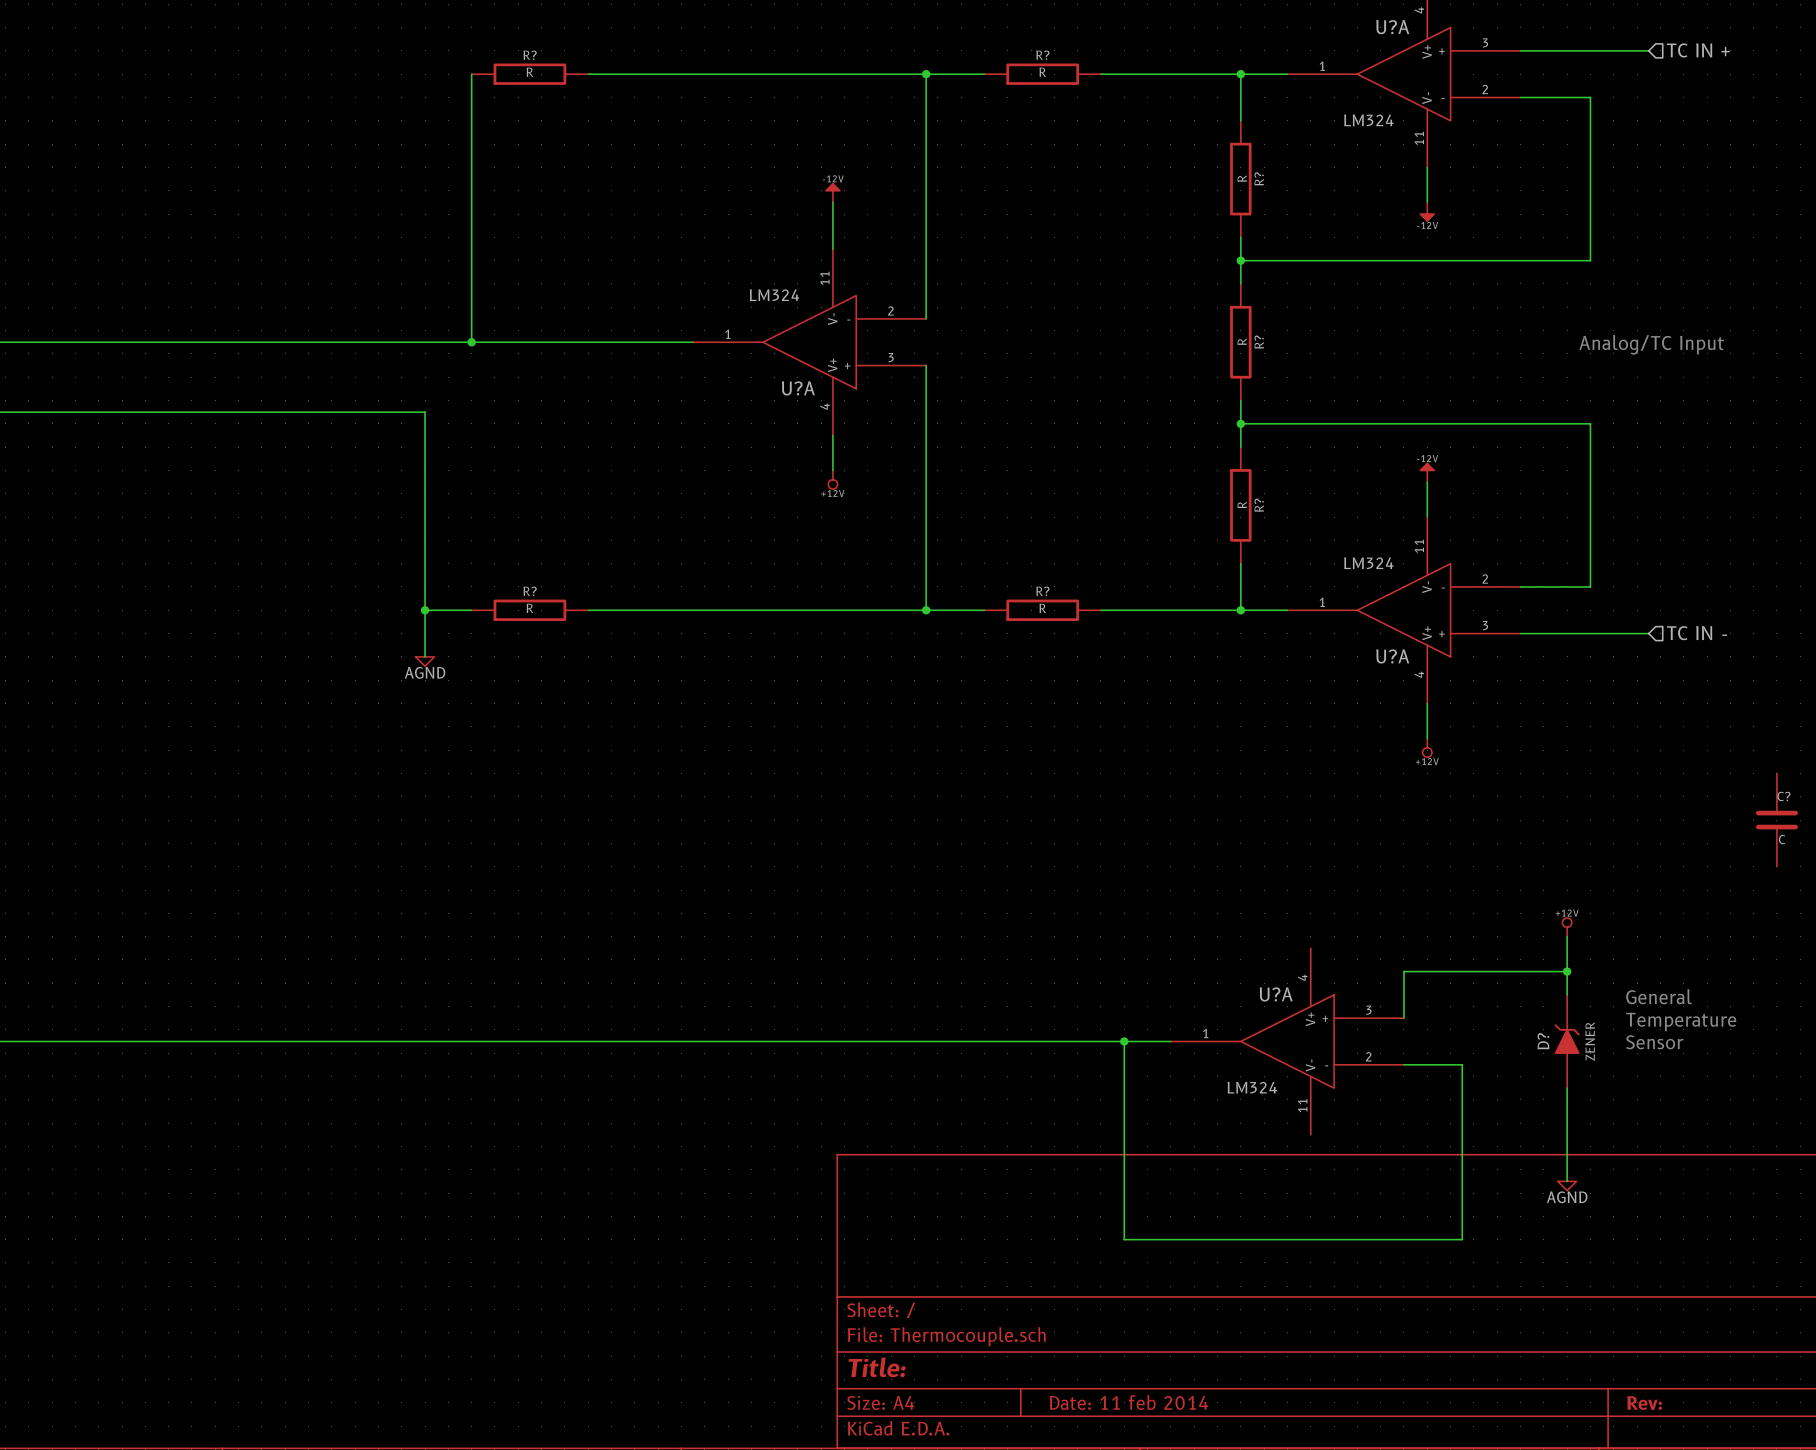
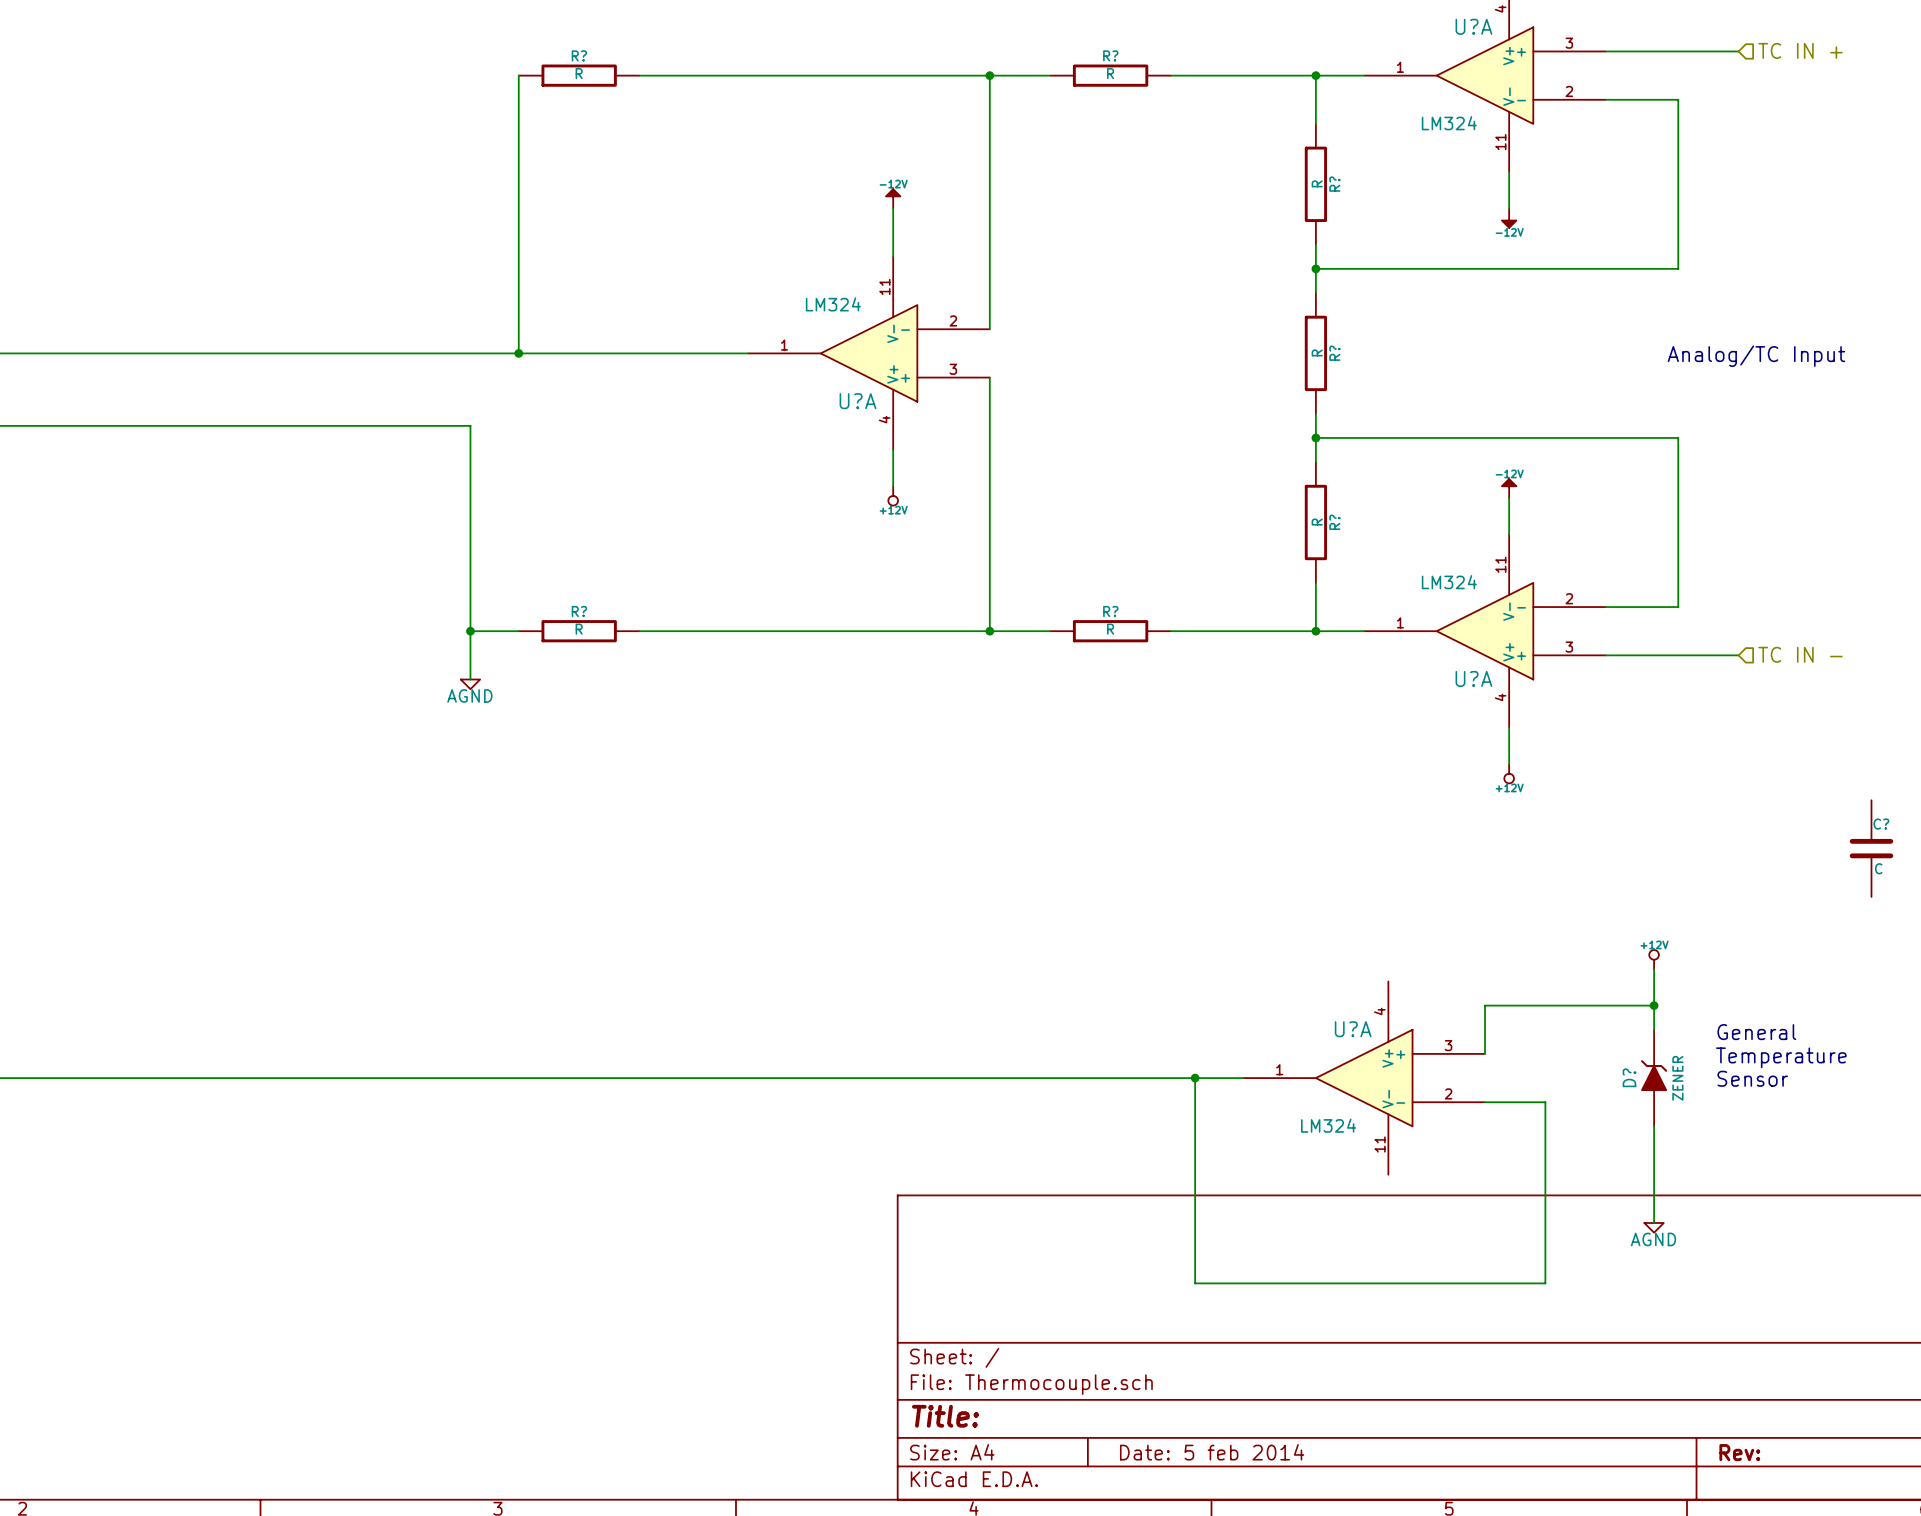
title block: Date: 11 feb 2014 (1129, 1402) -> Date: 5 feb 2014 (1212, 1452)

